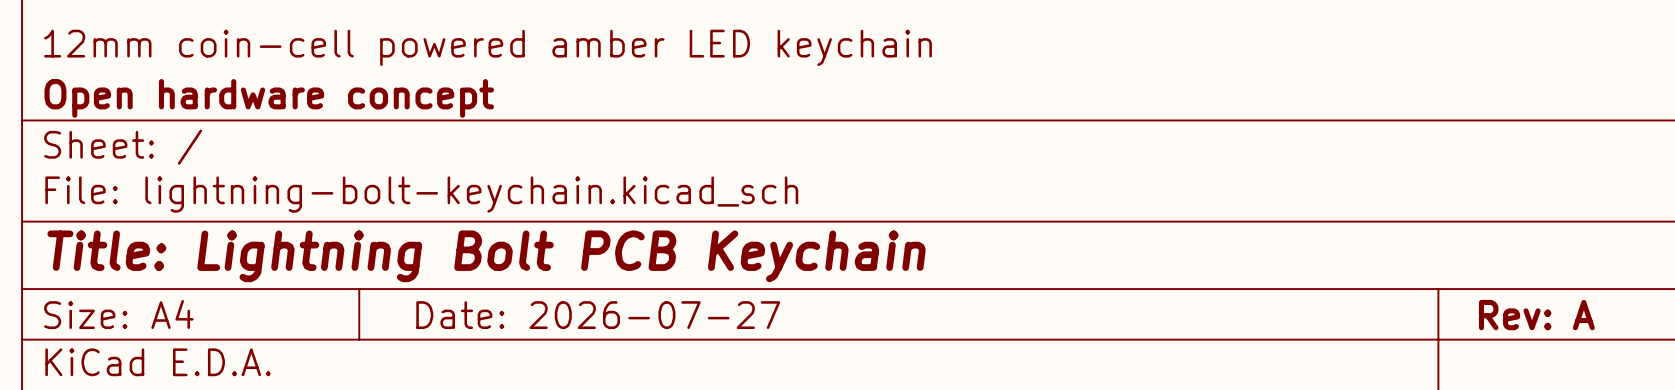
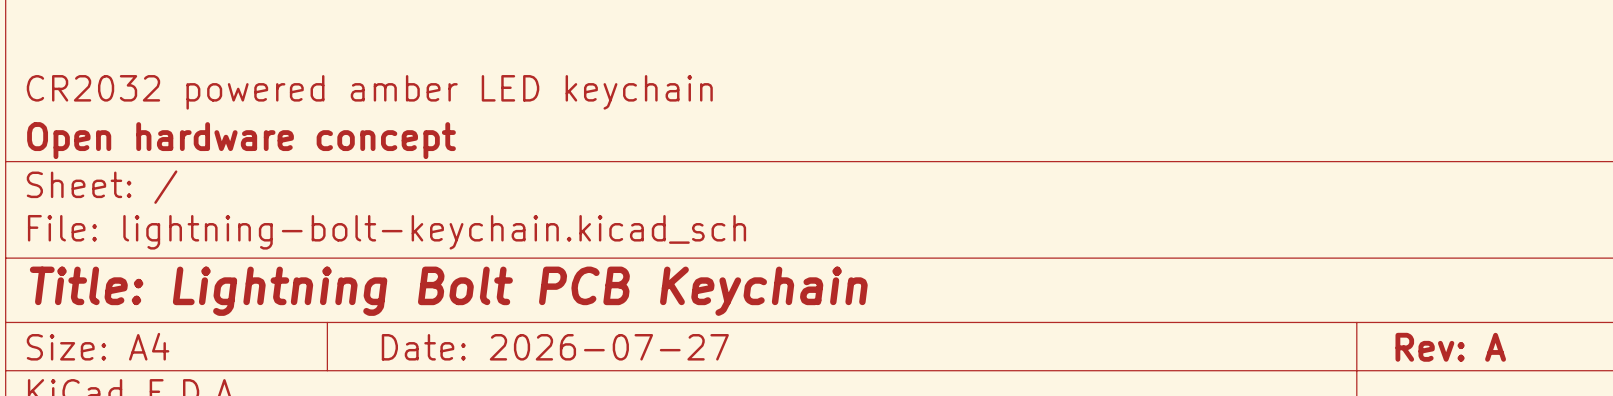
title block: 12mm coin-cell powered amber LED keychain (488, 47) -> CR2032 powered amber LED keychain (369, 92)

